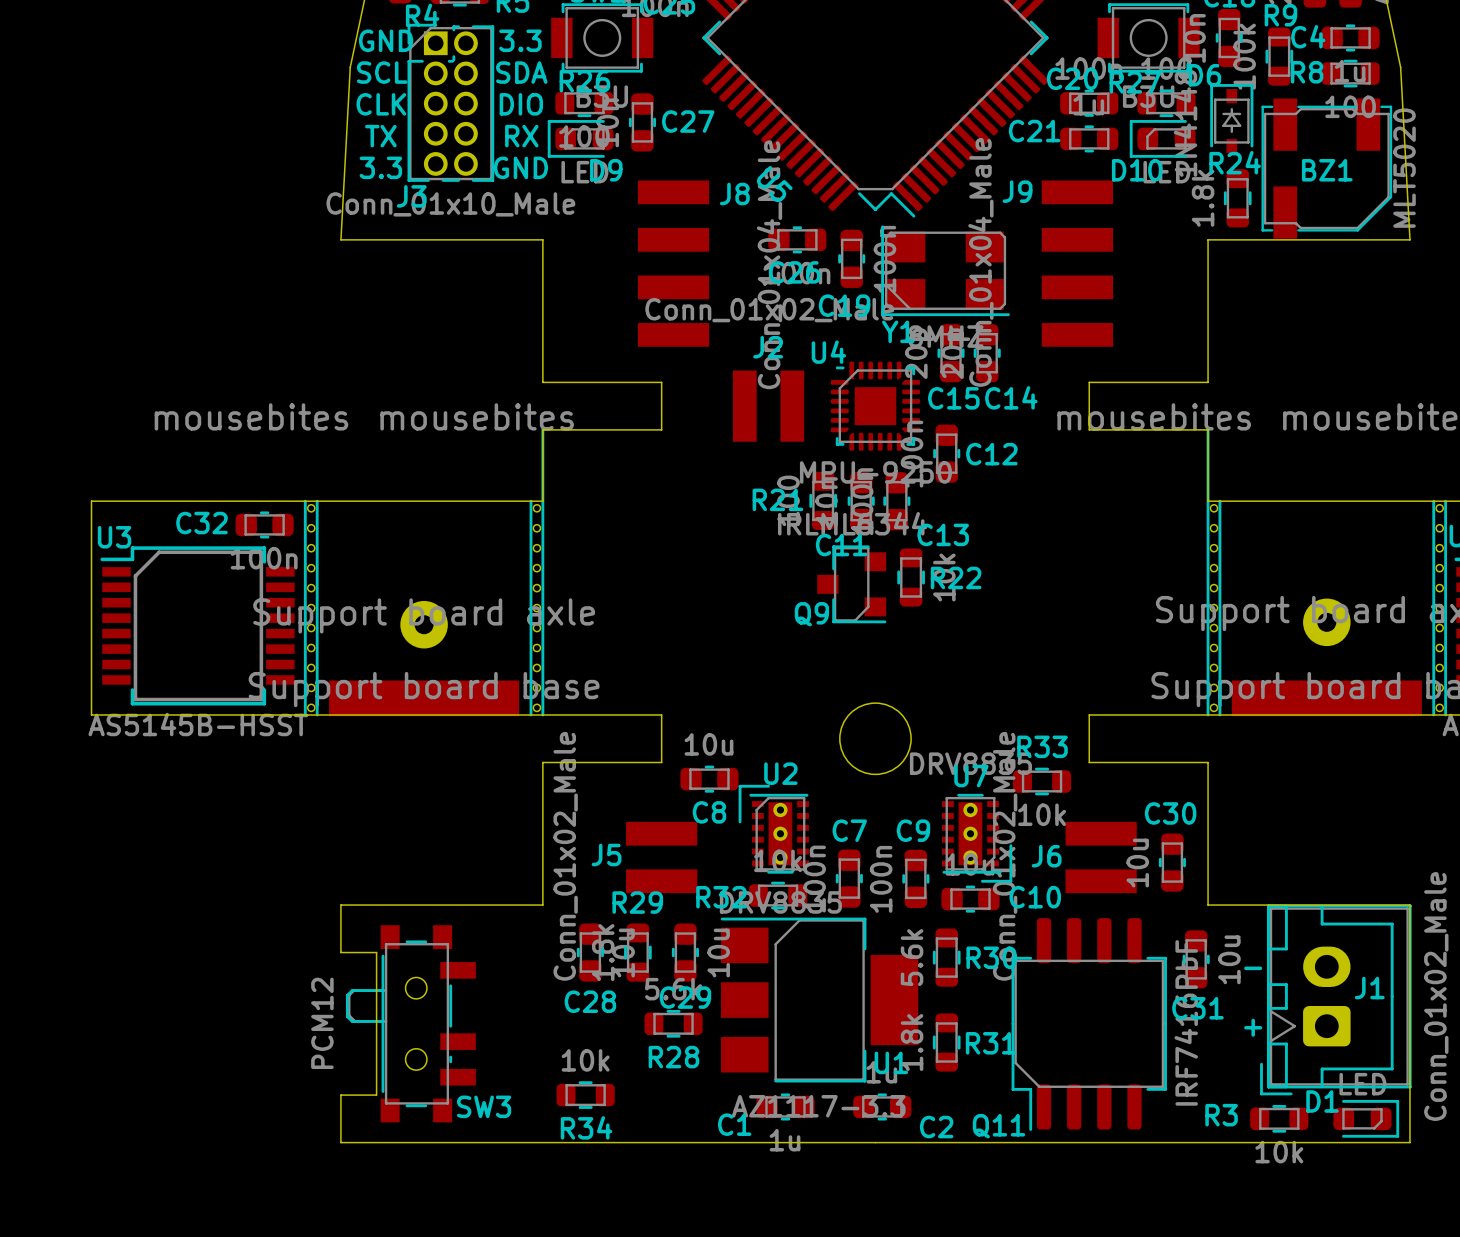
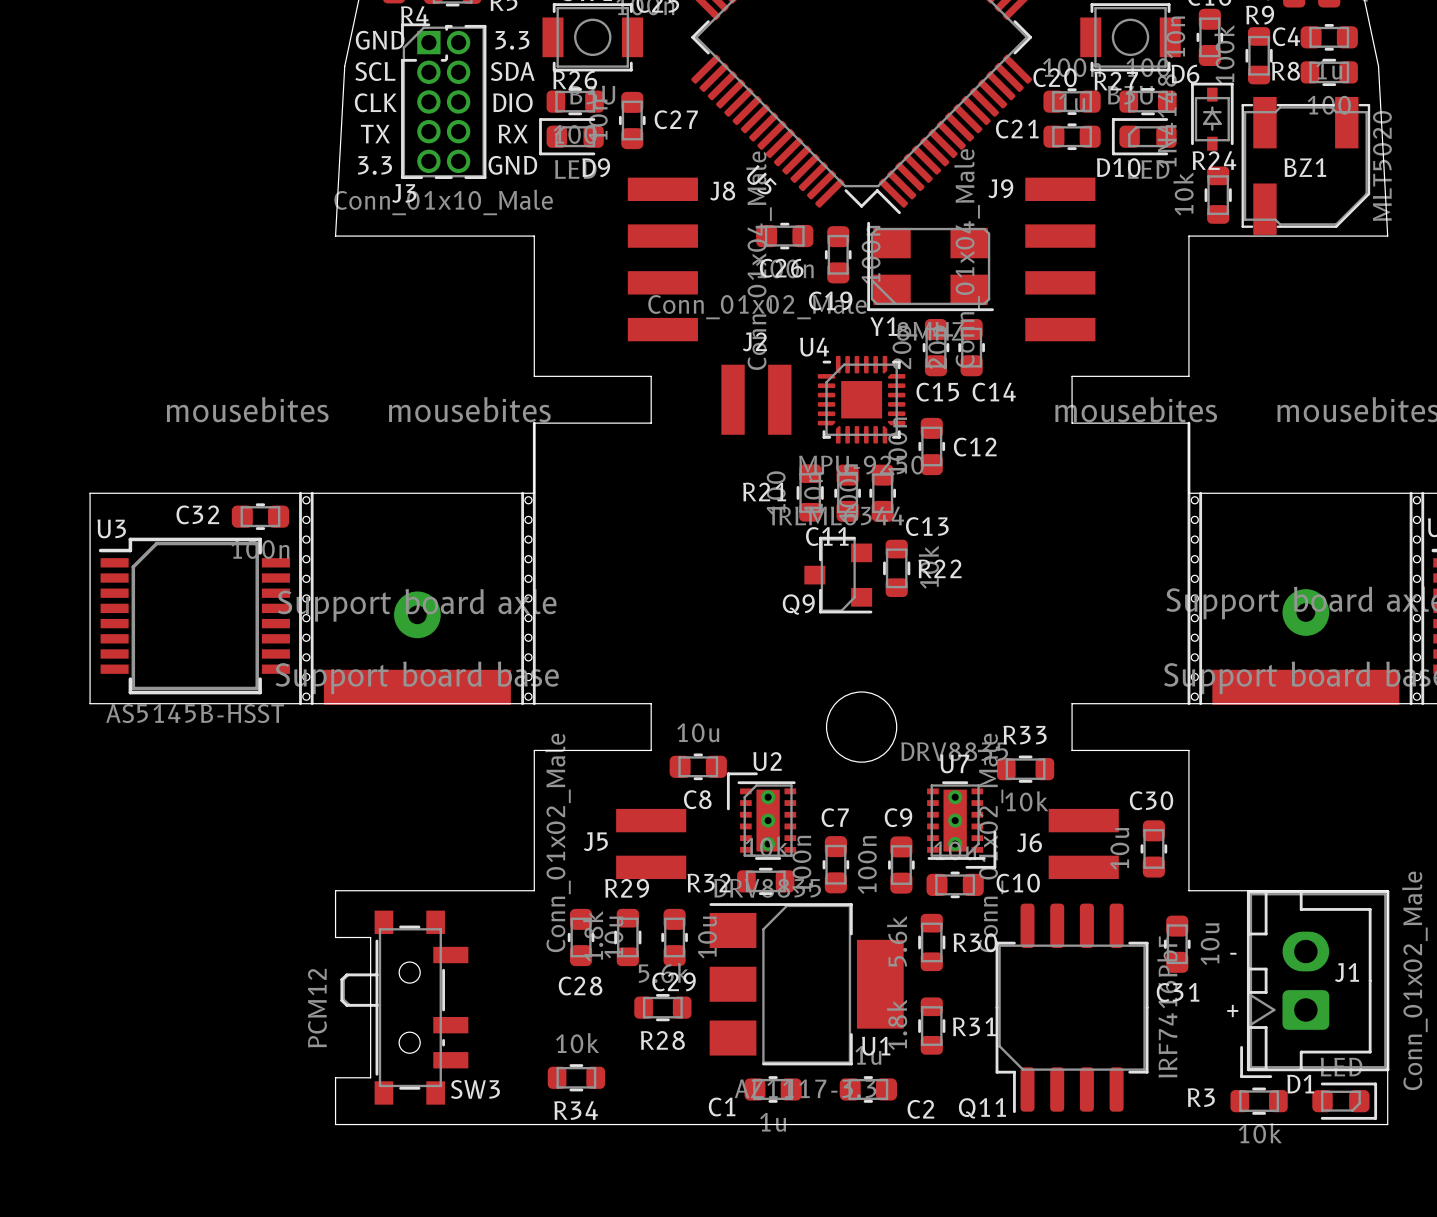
R24 value: 1.8k (1203, 198) -> 10k (1183, 193)

